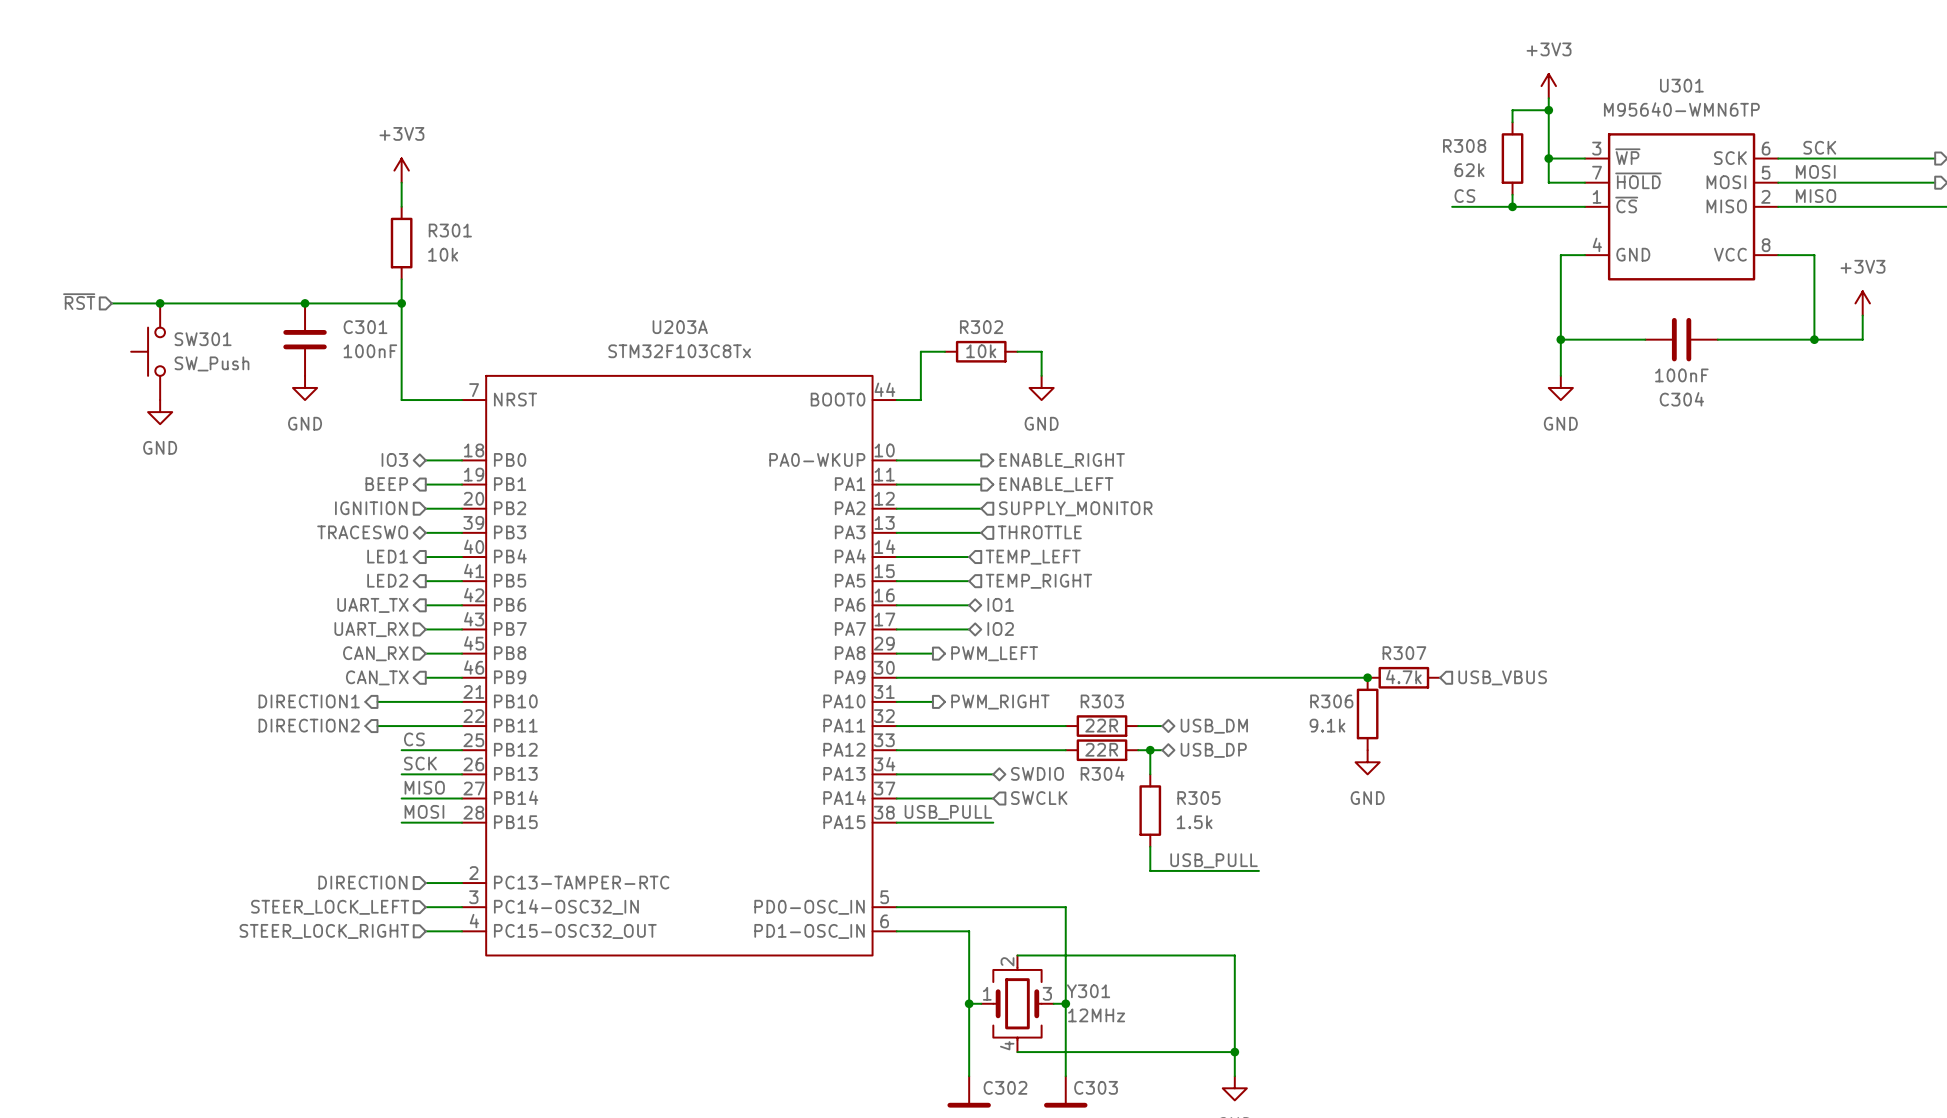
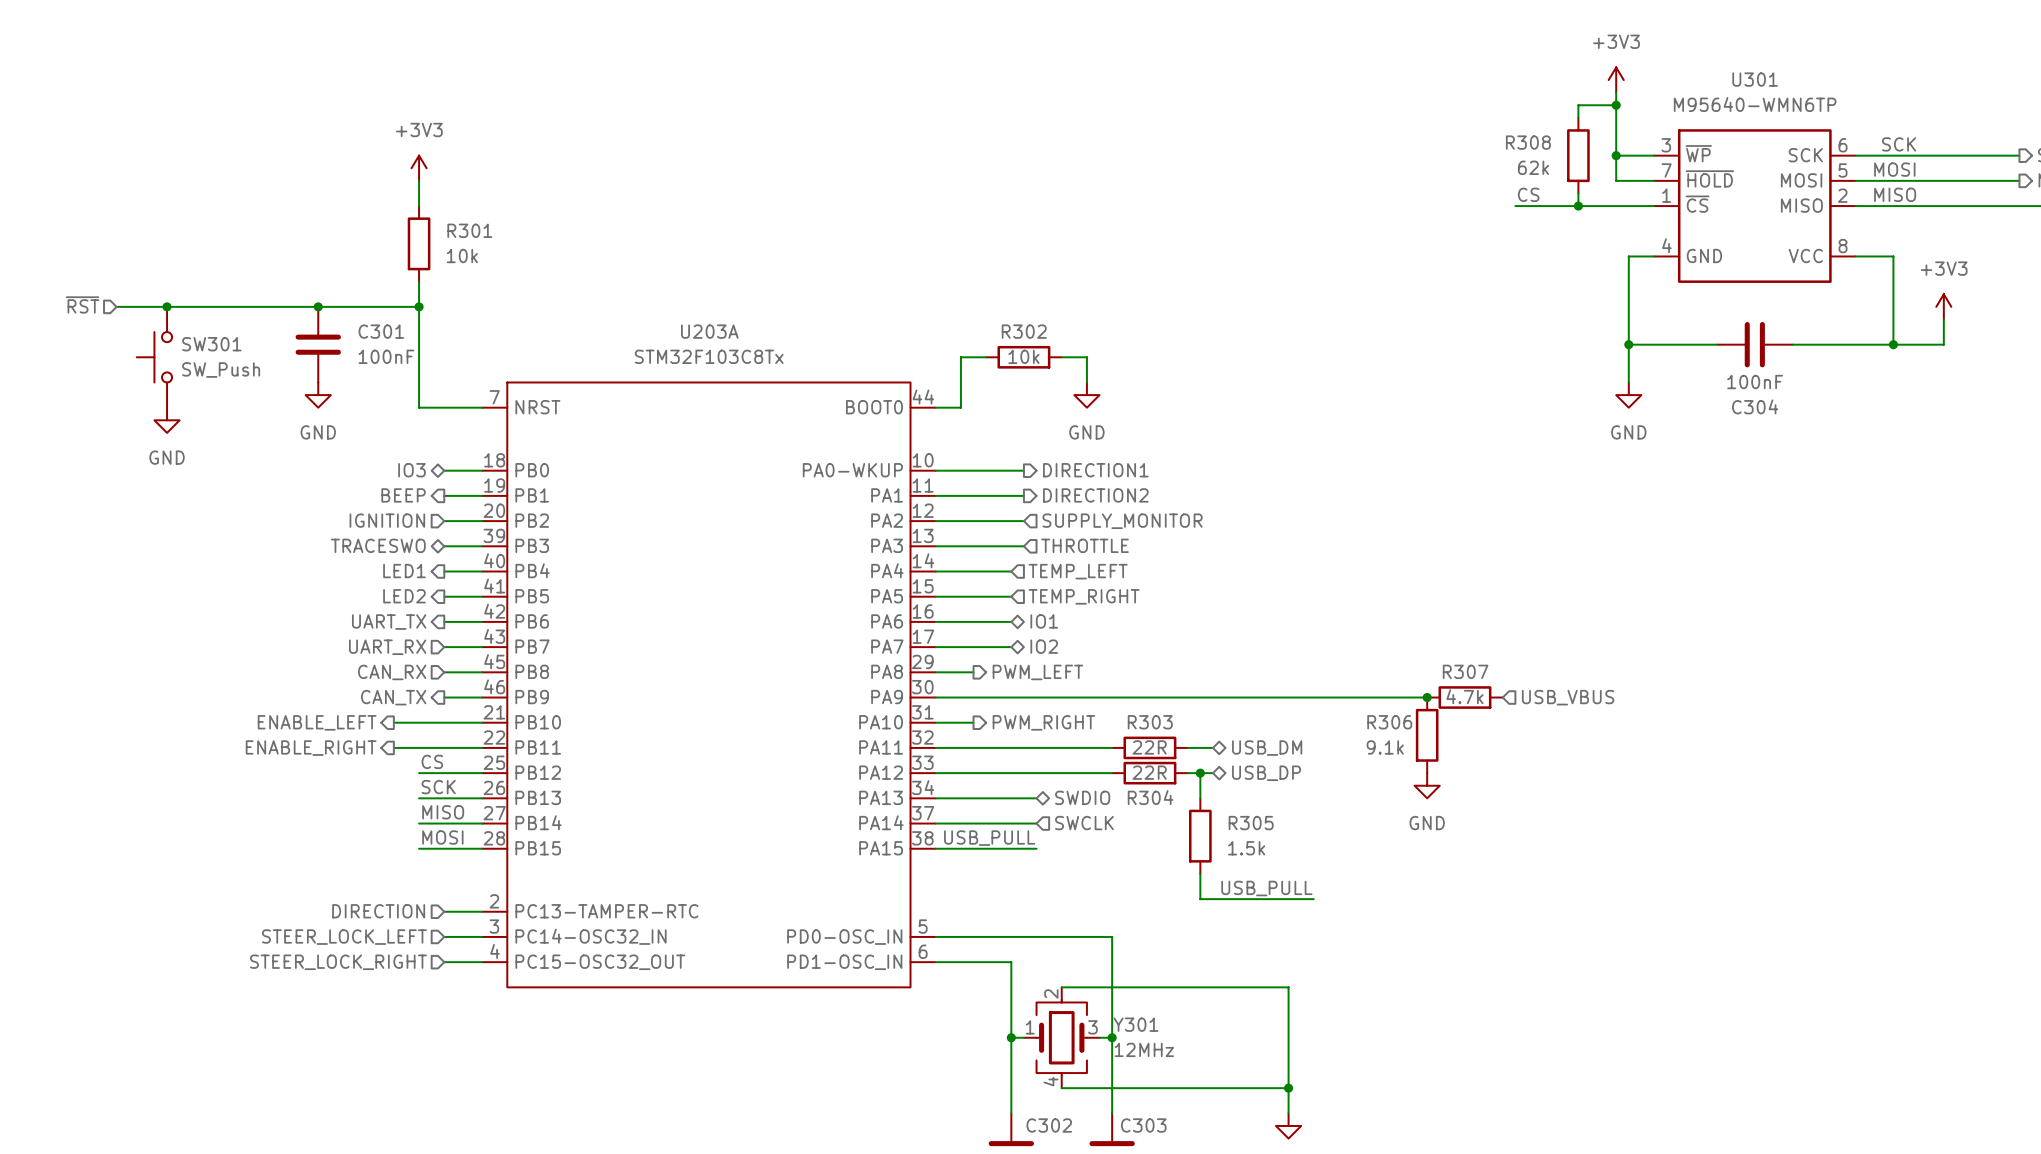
hierarchical label: ENABLE_RIGHT (1062, 460) -> DIRECTION1 (1095, 470)
hierarchical label: ENABLE_LEFT (1056, 484) -> DIRECTION2 (1095, 495)
hierarchical label: DIRECTION1 (309, 701) -> ENABLE_LEFT (317, 722)
hierarchical label: DIRECTION2 (309, 725) -> ENABLE_RIGHT (311, 748)

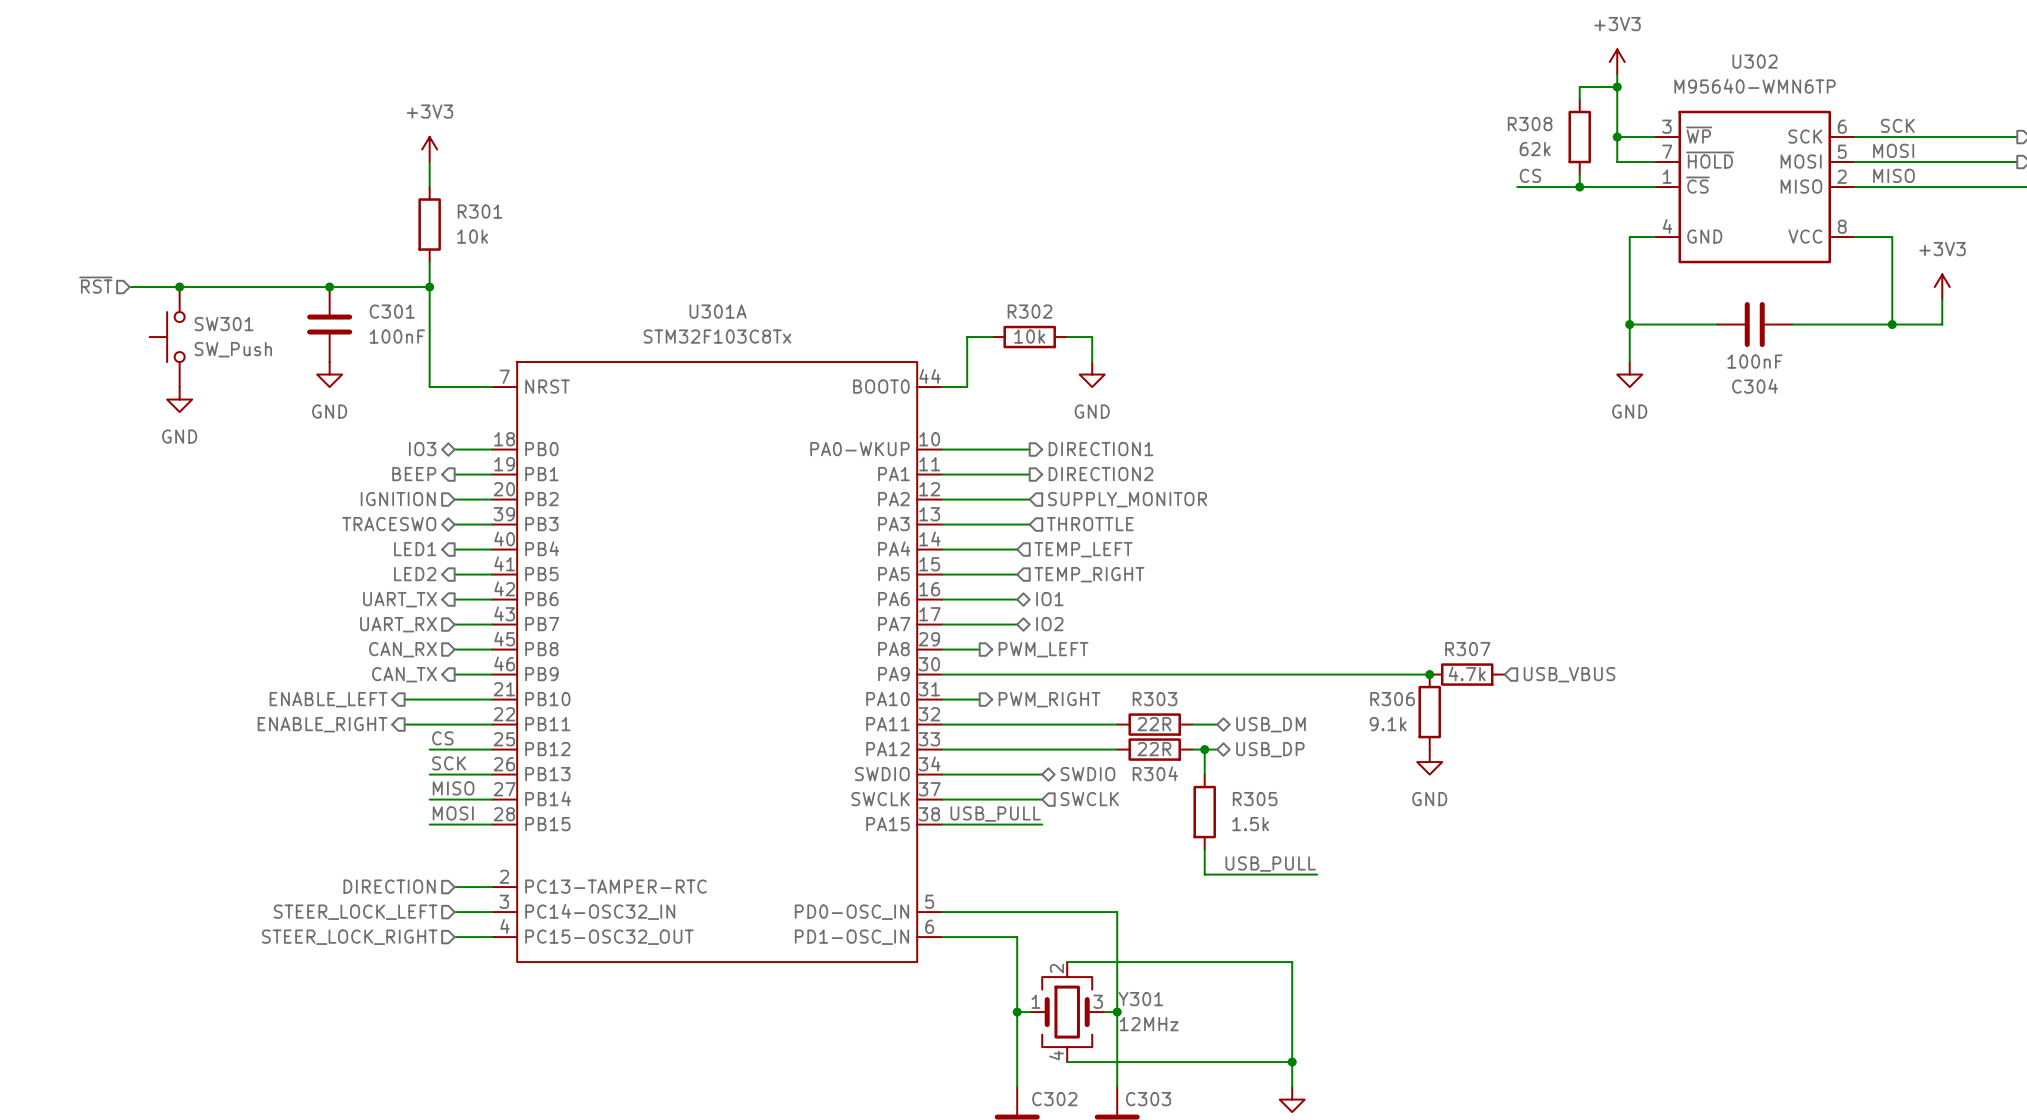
U301 name: U301 (1755, 79) -> U302 (1755, 61)
U203A name: U203A (709, 331) -> U301A (718, 311)
U203A pin name: PA13 (881, 797) -> SWDIO (882, 774)
U203A pin name: PA14 (881, 822) -> SWCLK (880, 799)

